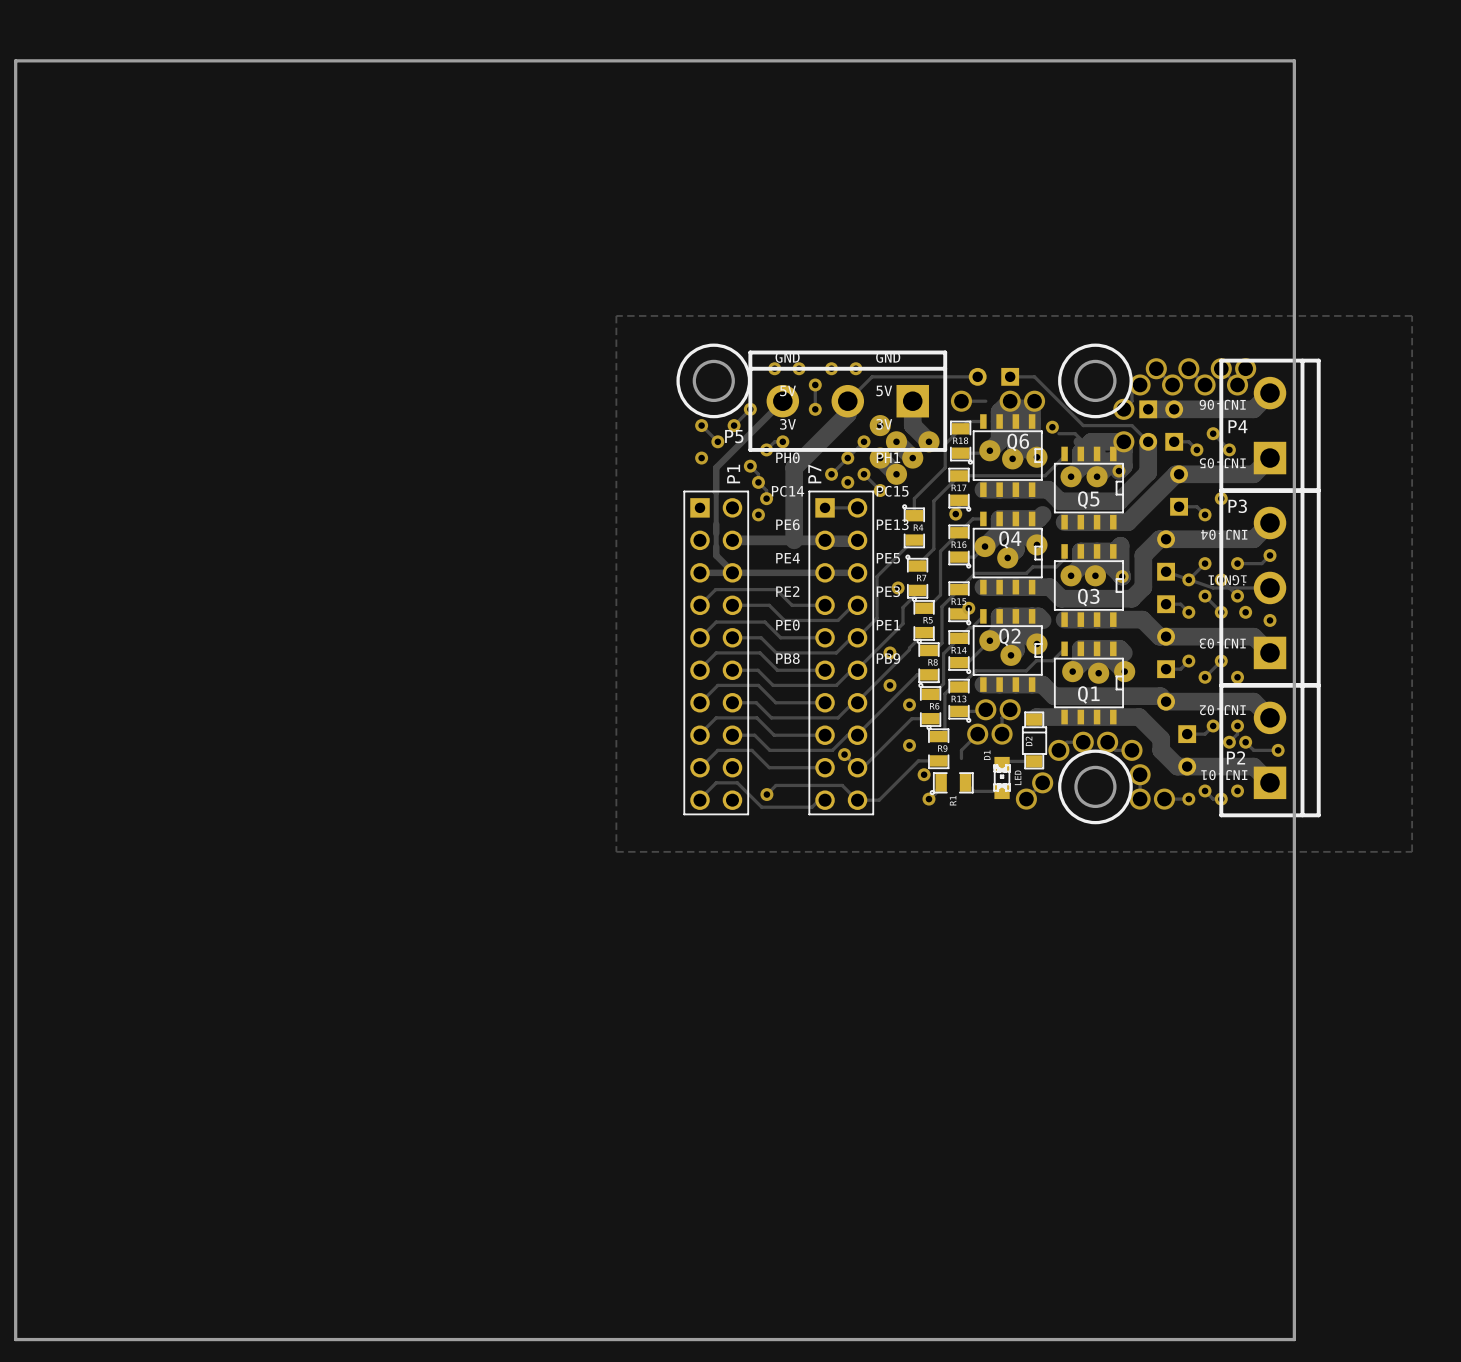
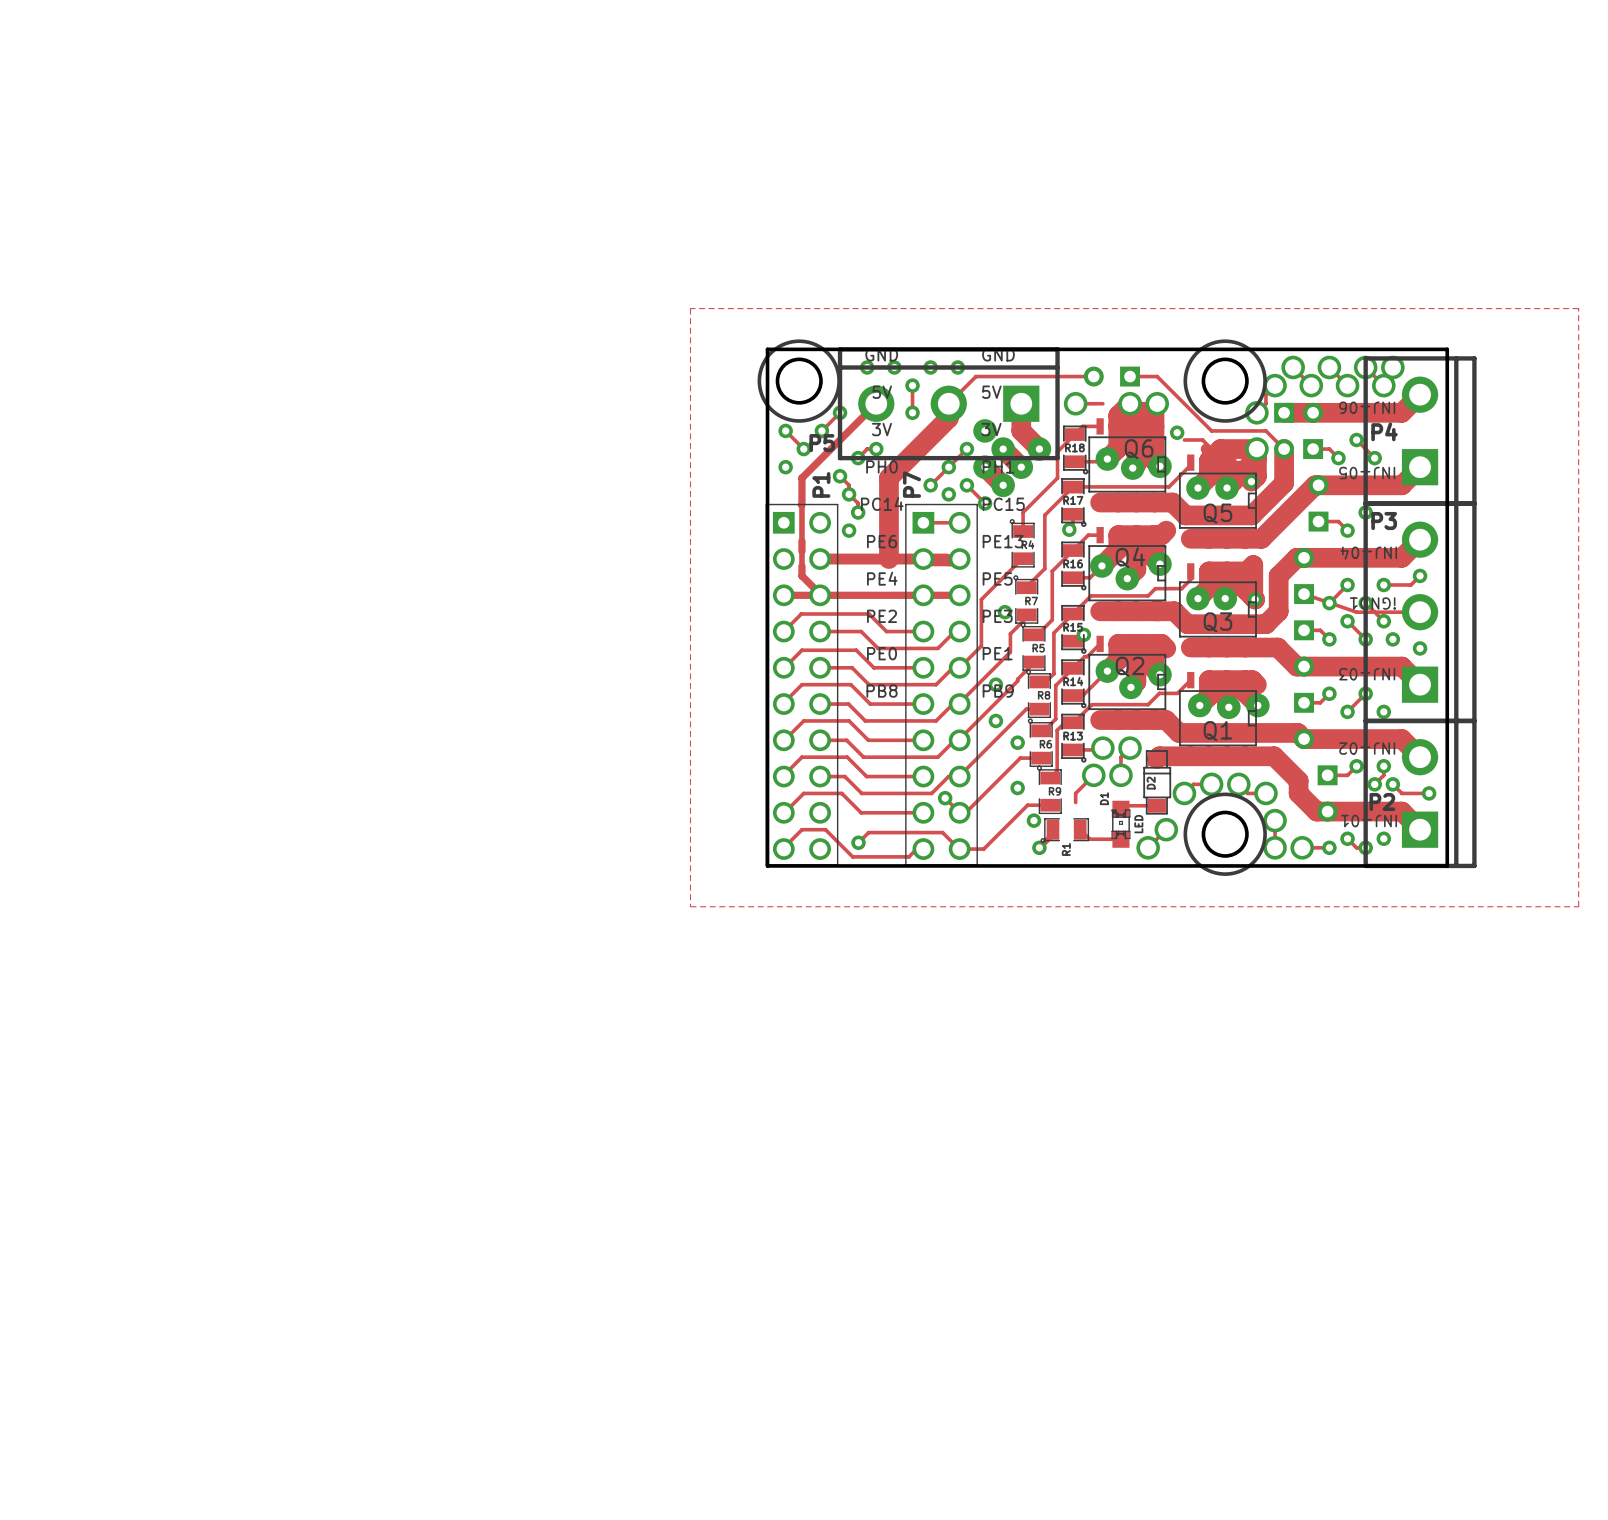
board edge: (1294, 352) (1294, 60) (15, 60) (15, 1339) (1294, 1339) (1294, 815) -> (1447, 349) (767, 349) (767, 865) (1447, 865)

